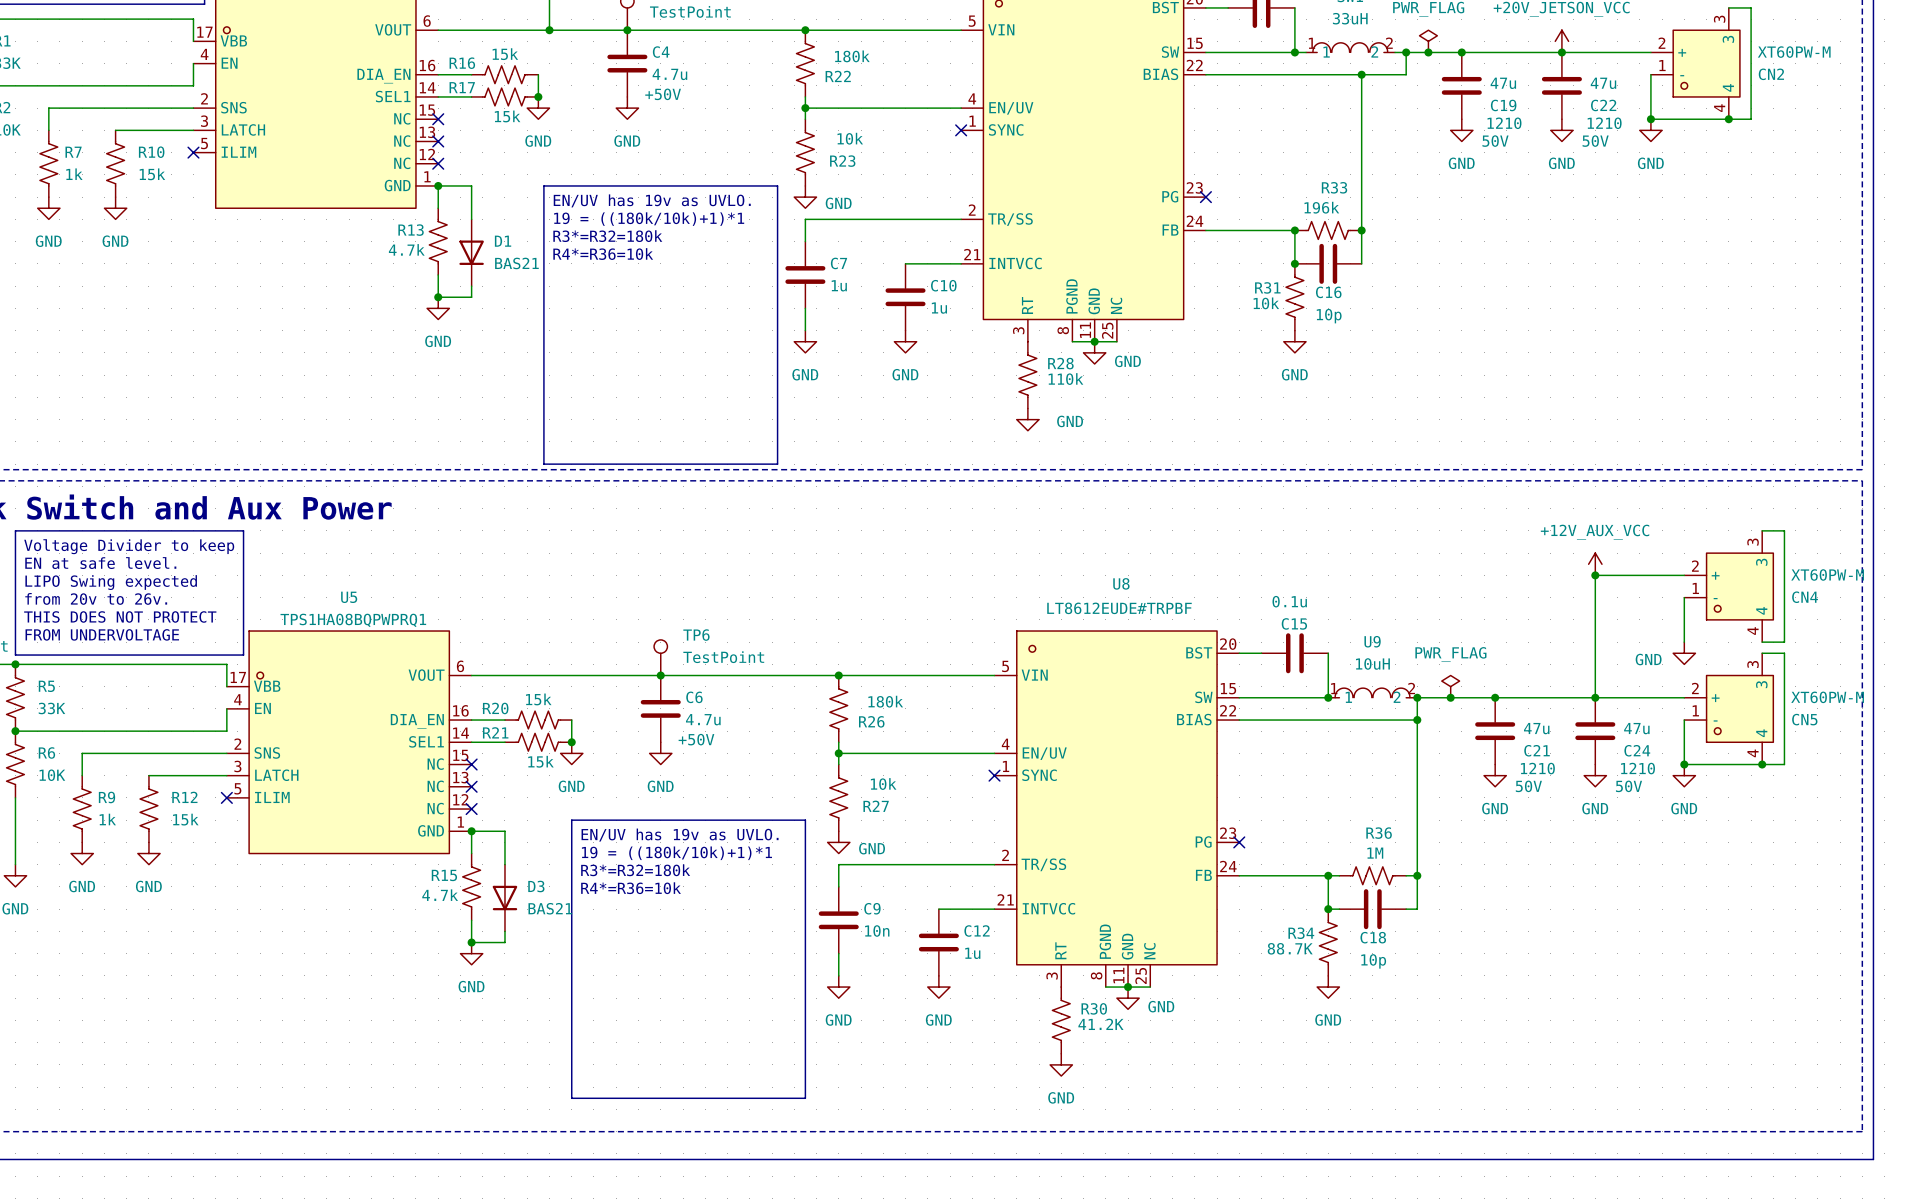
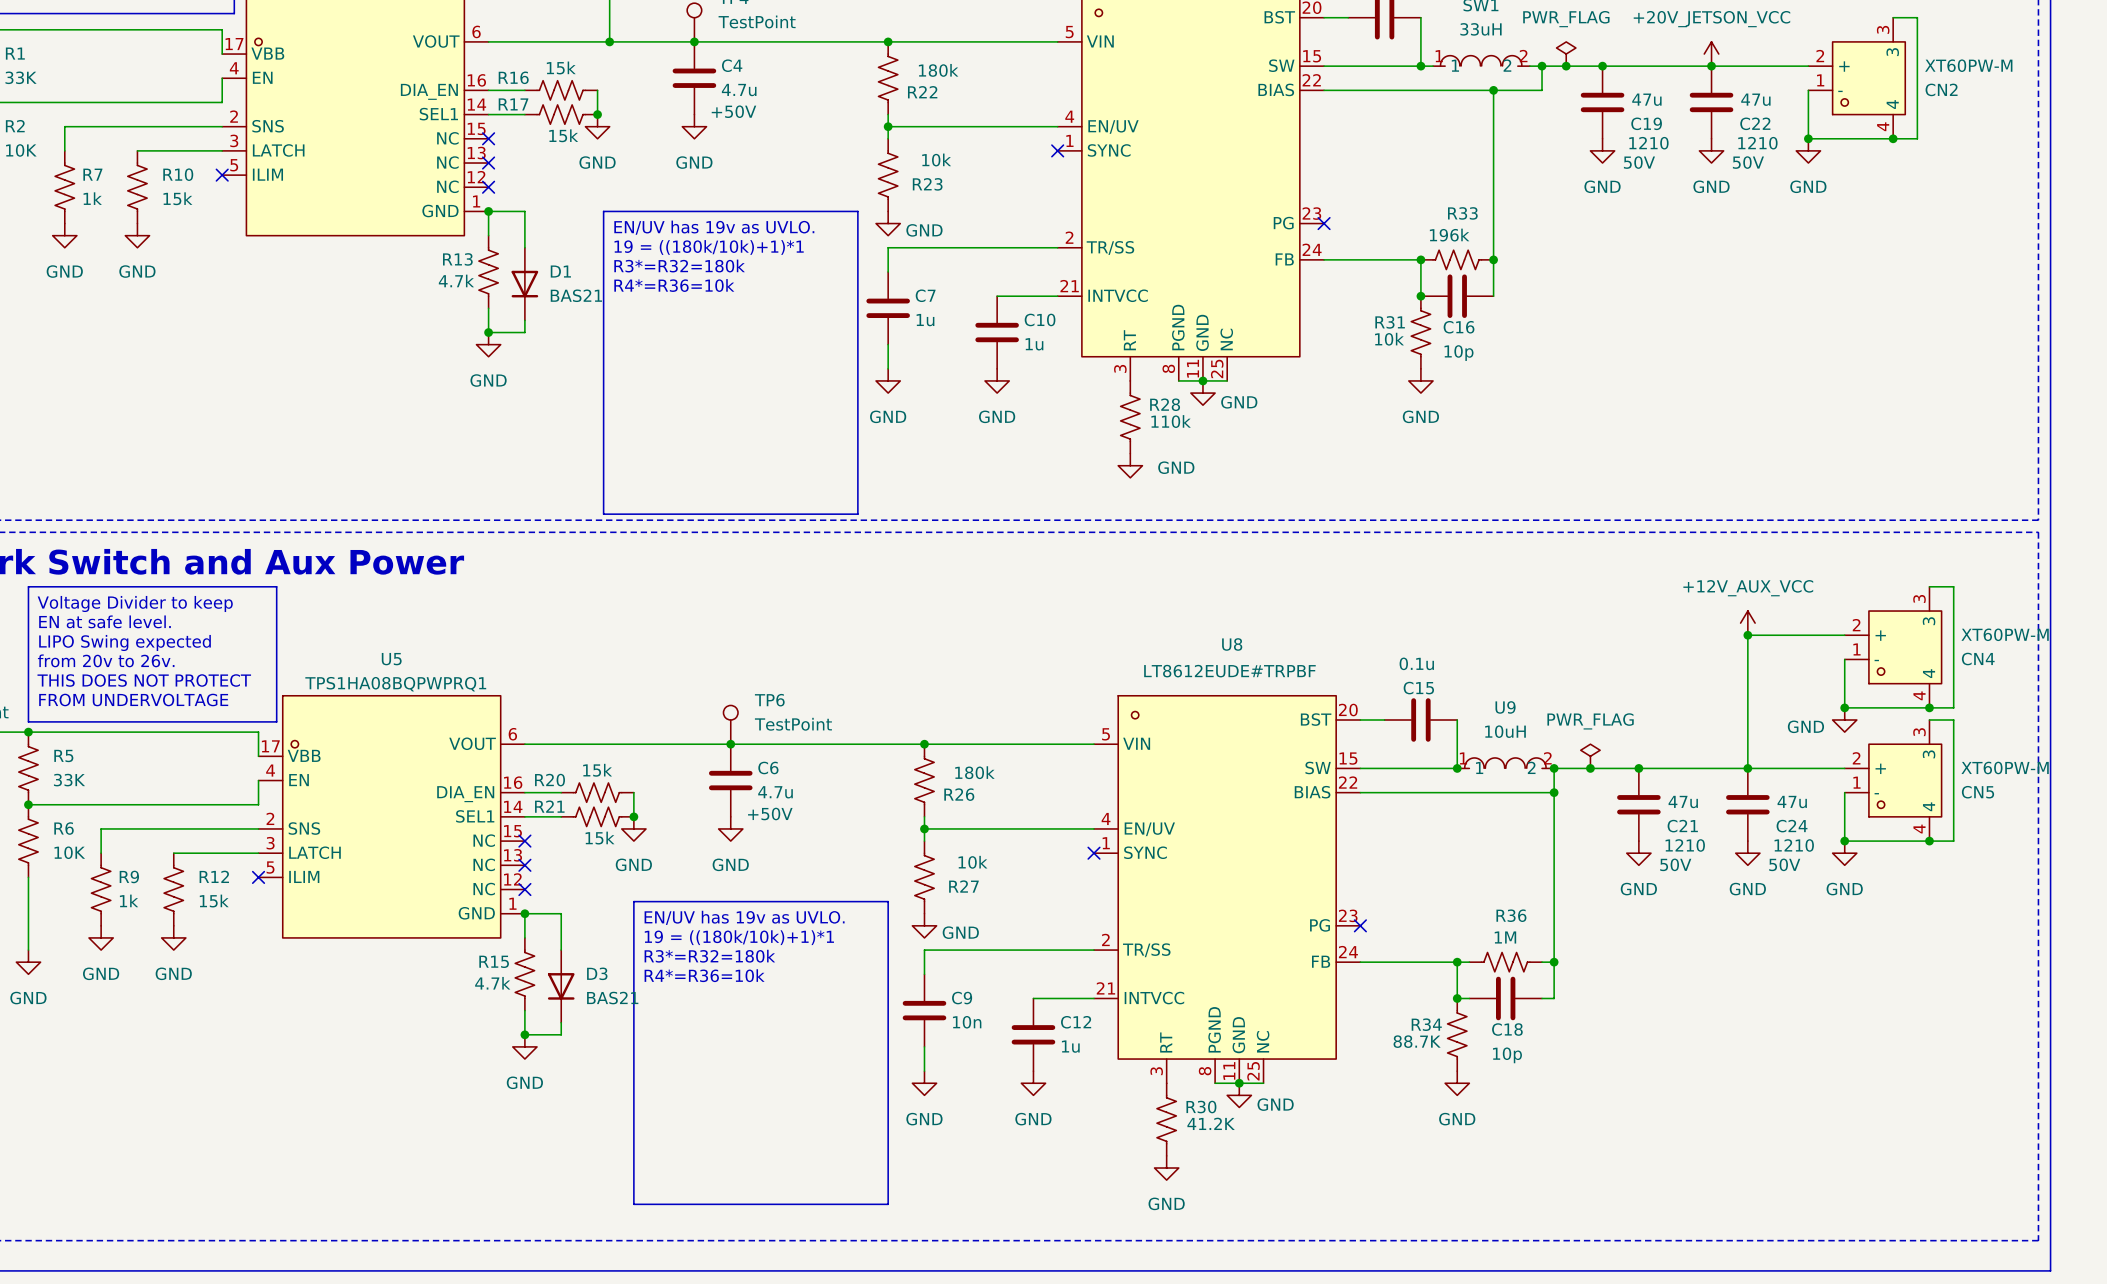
wire: none -> (1844, 707) (1929, 707)
junction: none -> (1844, 707)
junction: none -> (1929, 707)

